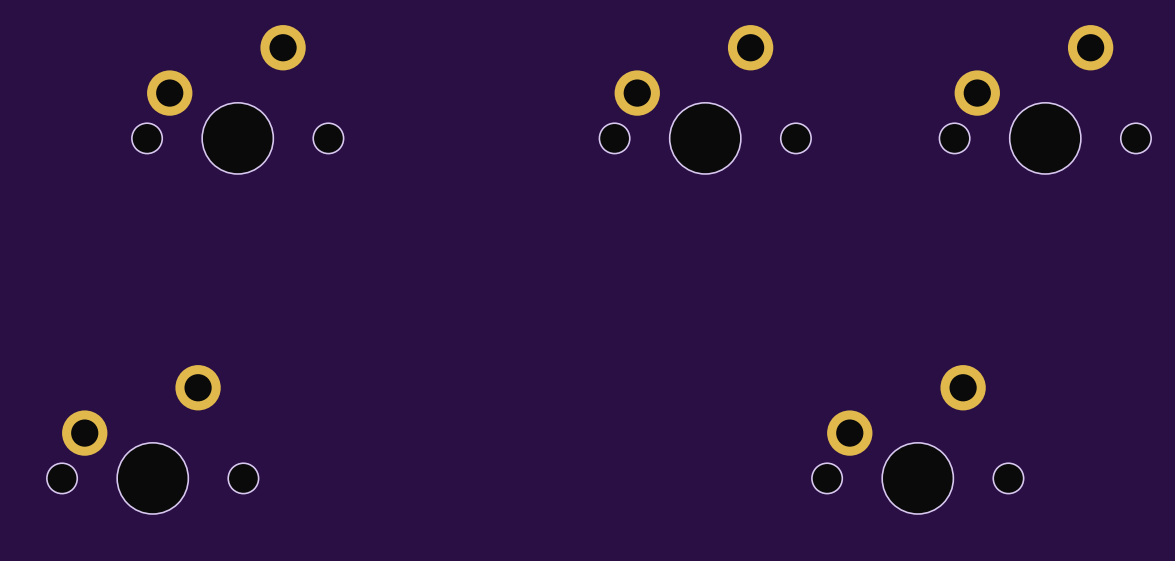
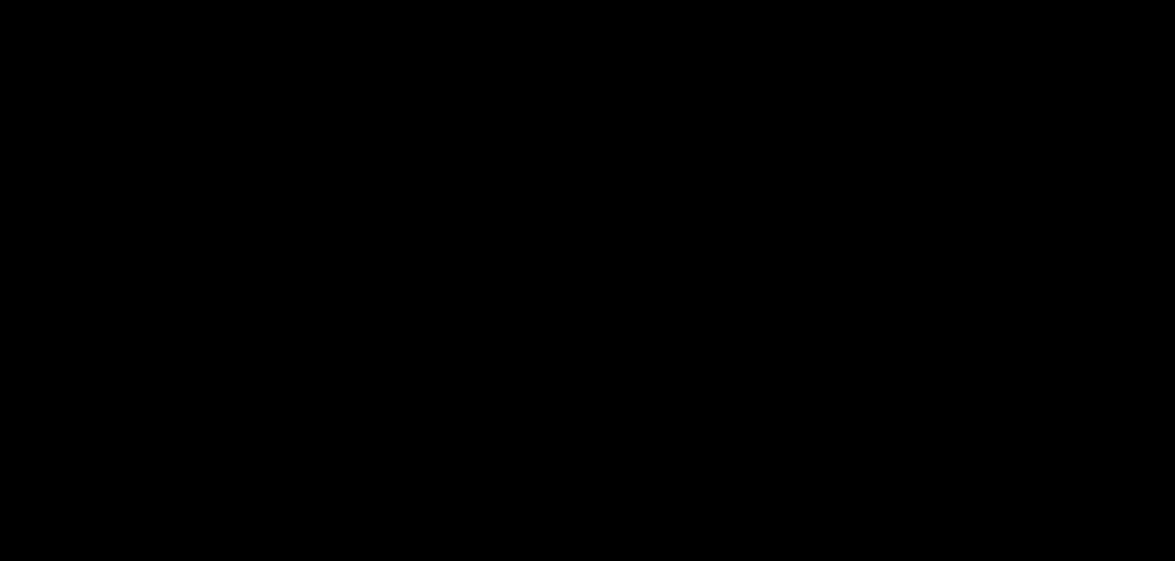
part: (237, 99) -> none
part: (705, 99) -> none
part: (1045, 99) -> none
part: (152, 439) -> none
part: (917, 439) -> none

